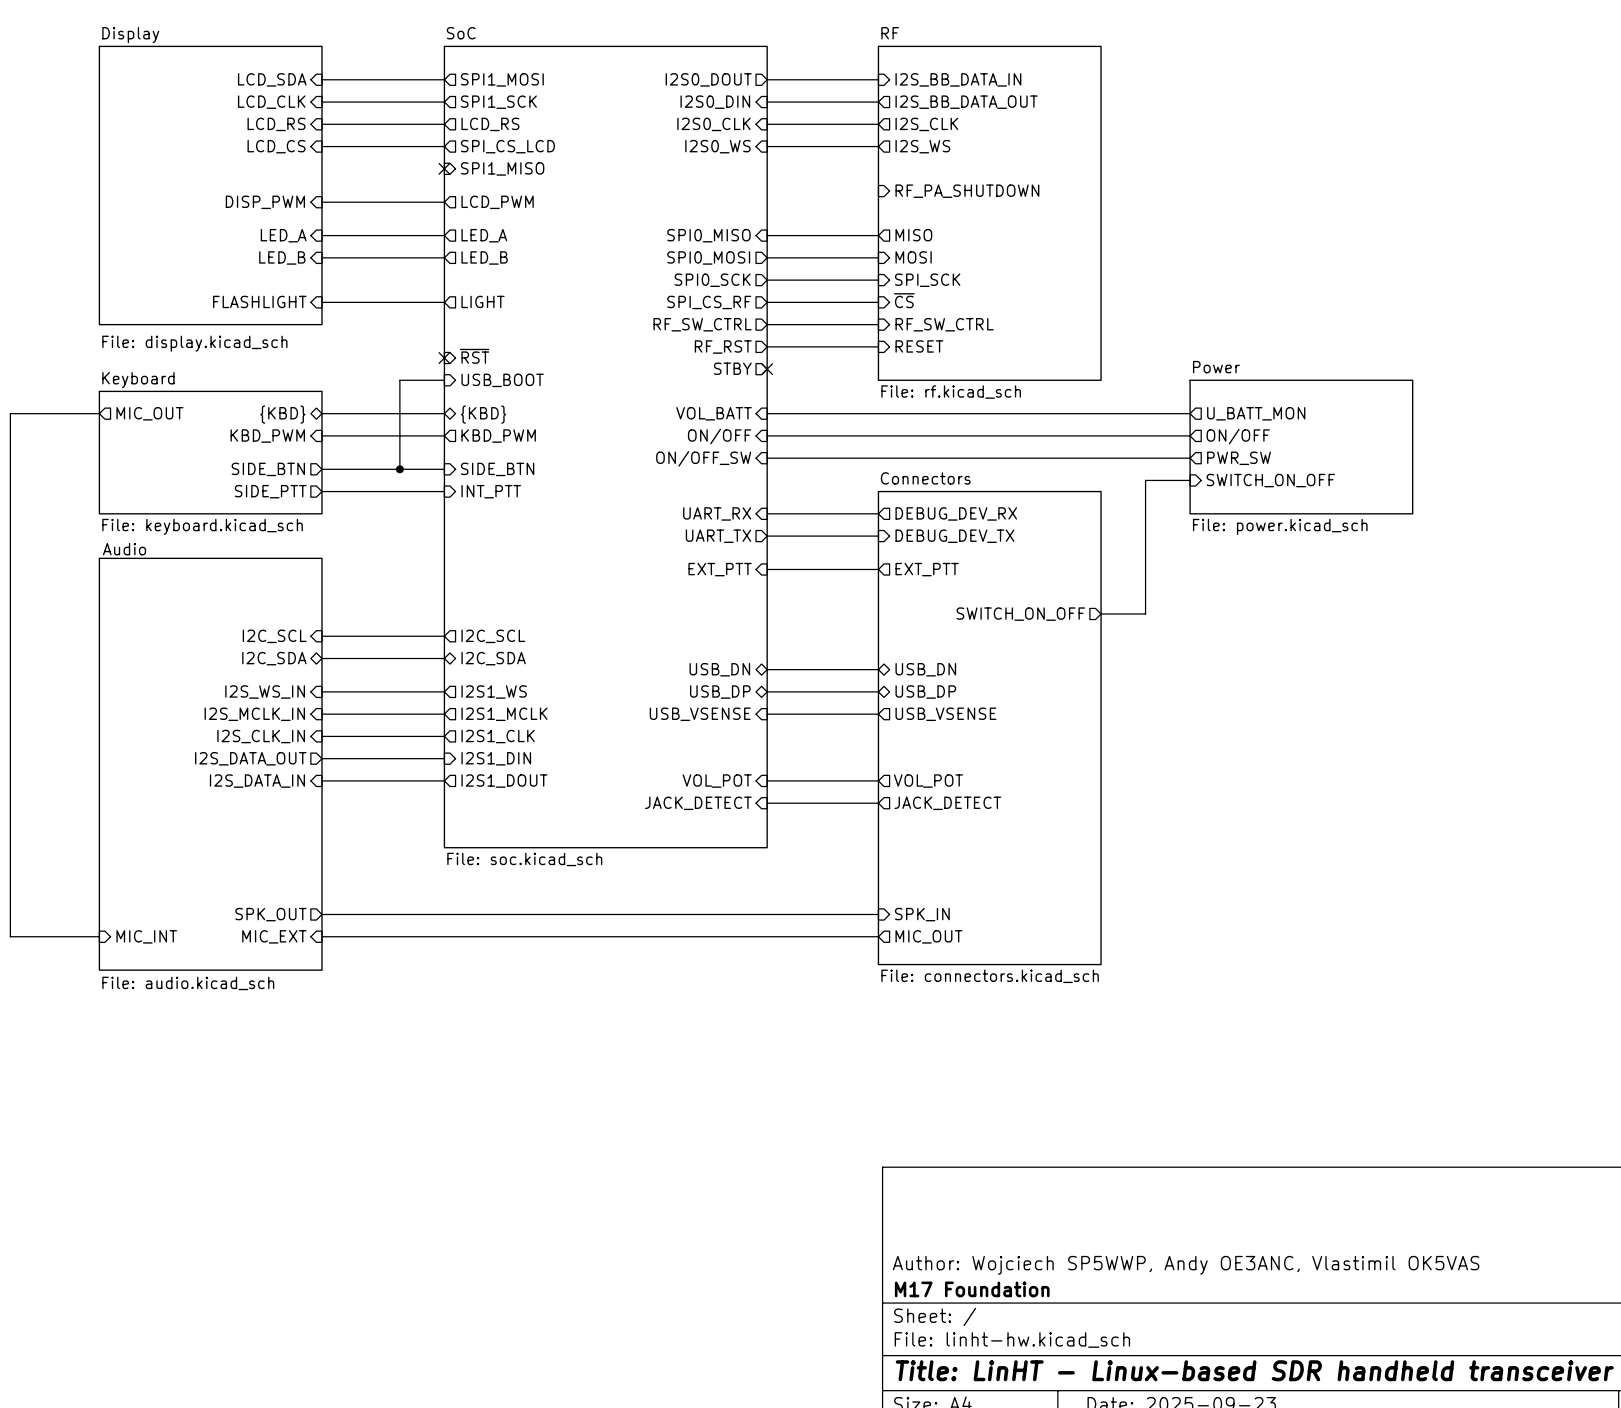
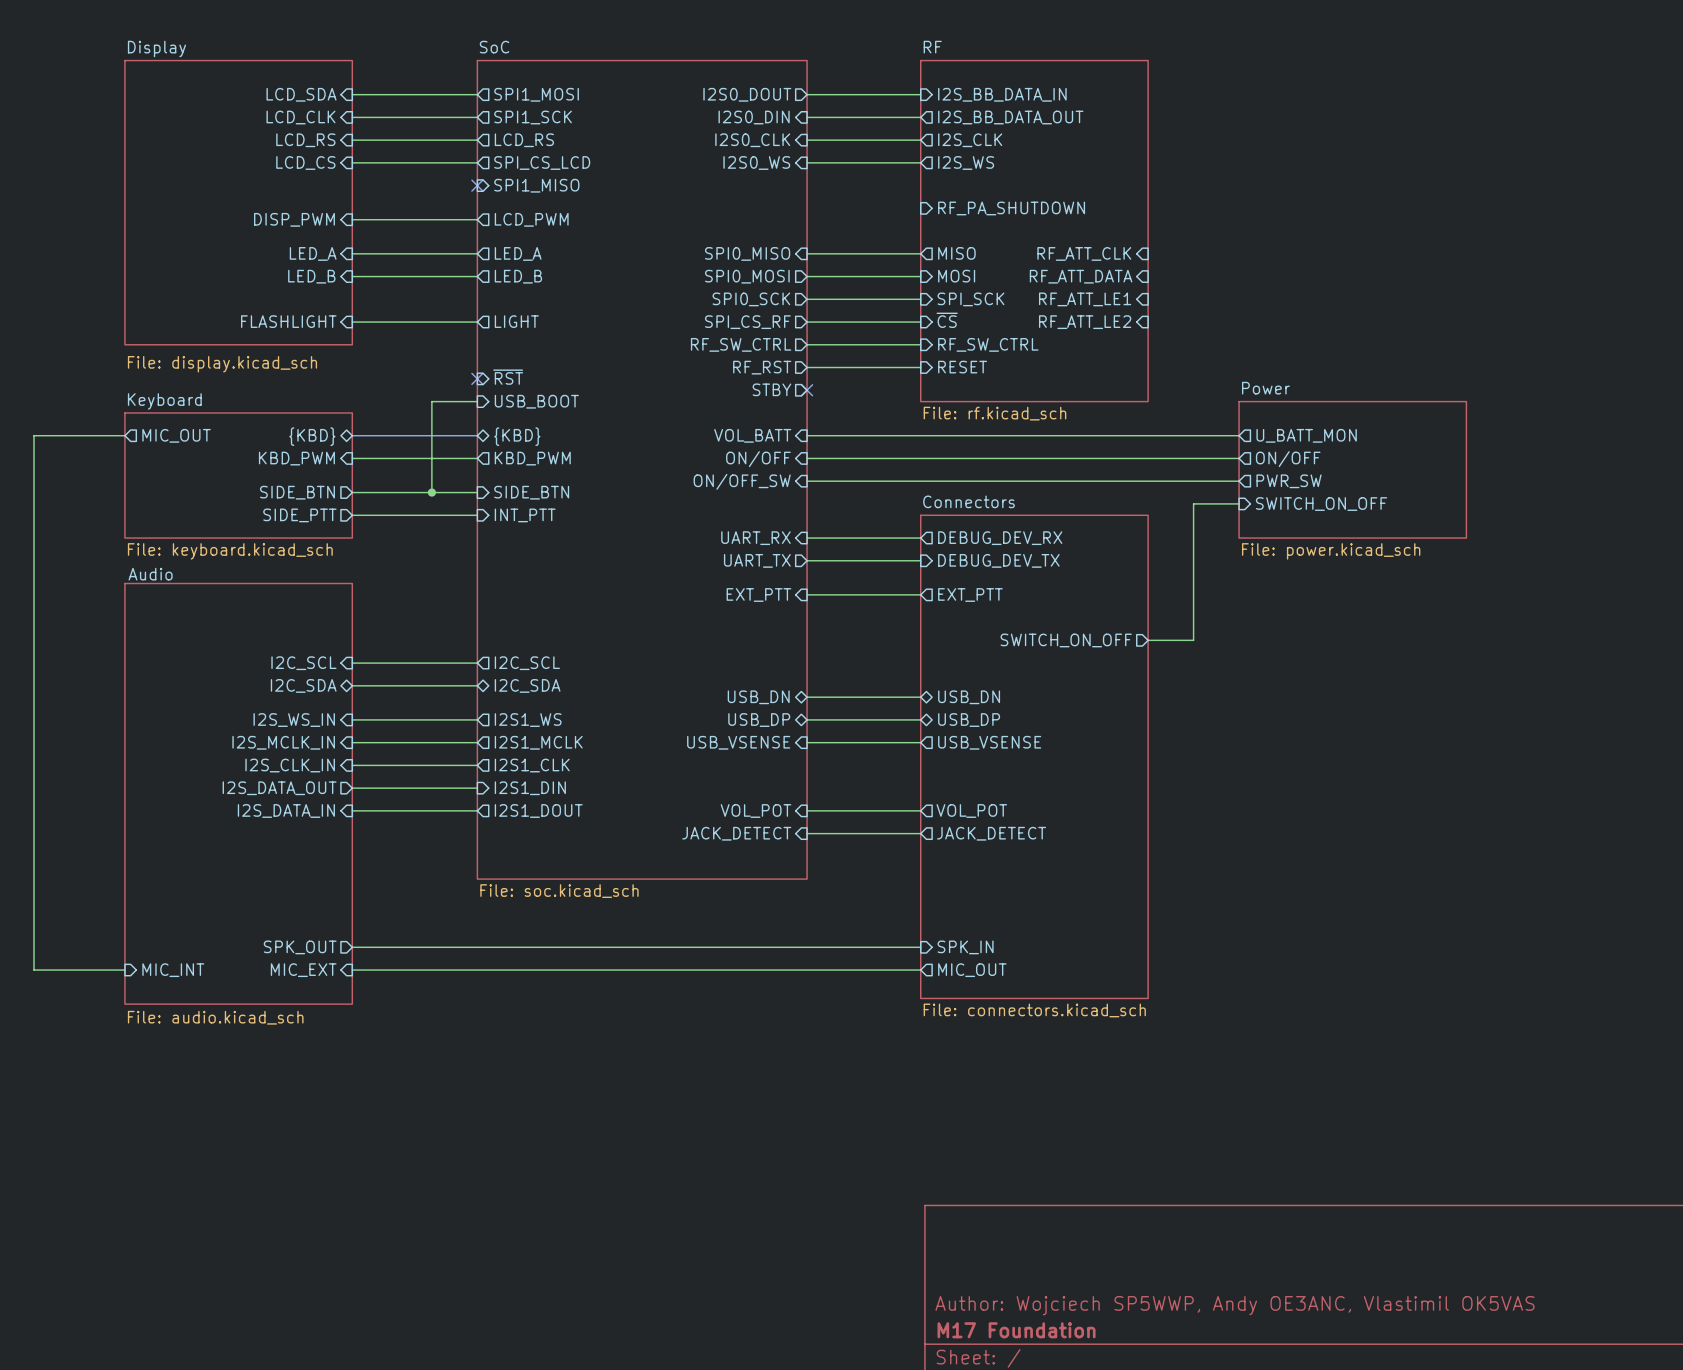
sheet pin: none -> RF_ATT_CLK (1084, 253)
sheet pin: none -> RF_ATT_DATA (1081, 276)
sheet pin: none -> RF_ATT_LE1 (1085, 299)
sheet pin: none -> RF_ATT_LE2 (1085, 322)

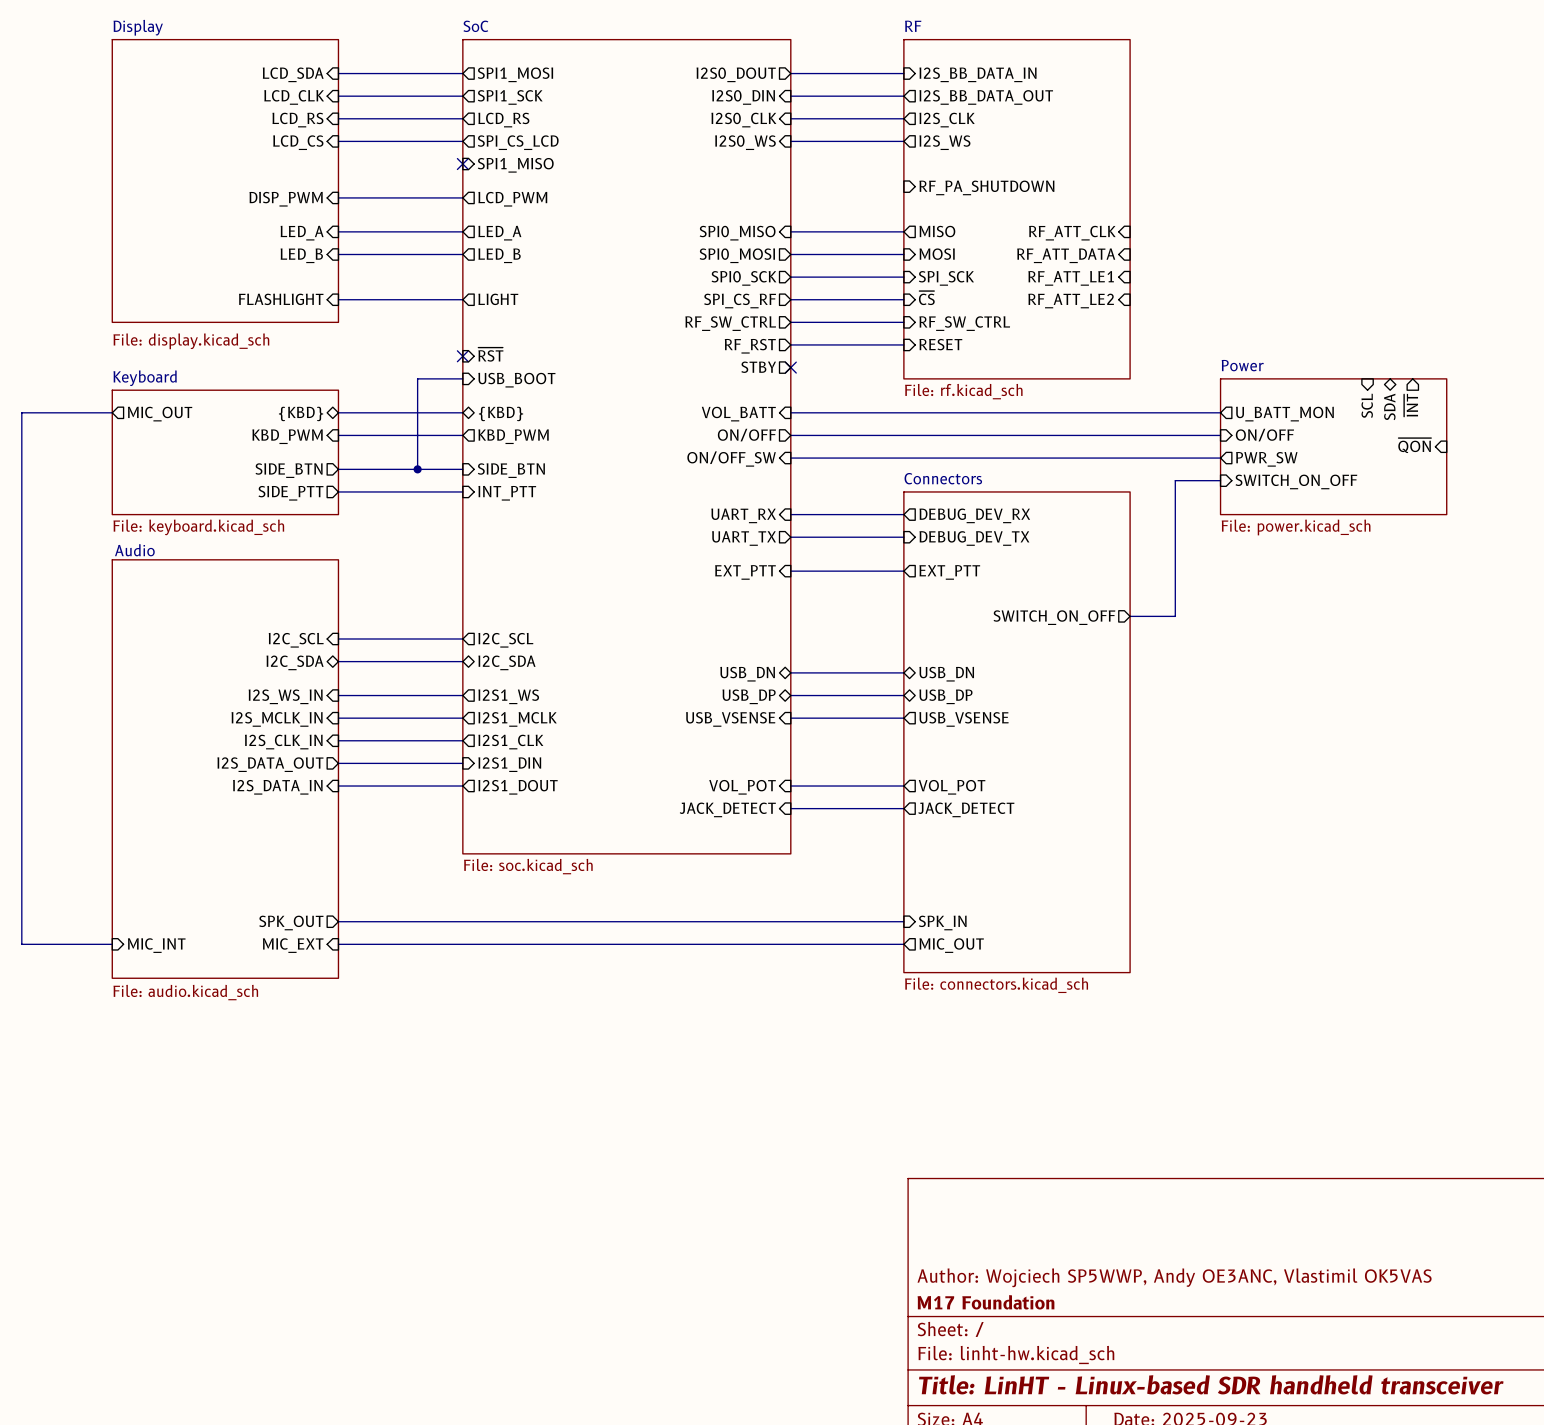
sheet pin: none -> ~{INT} (1411, 405)
sheet pin: none -> SCL (1367, 405)
sheet pin: none -> SDA (1389, 406)
sheet pin shape: input (758, 459) -> output (746, 435)
sheet pin shape: output (1288, 459) -> input (1264, 435)
sheet pin: none -> ~{QON} (1414, 445)

